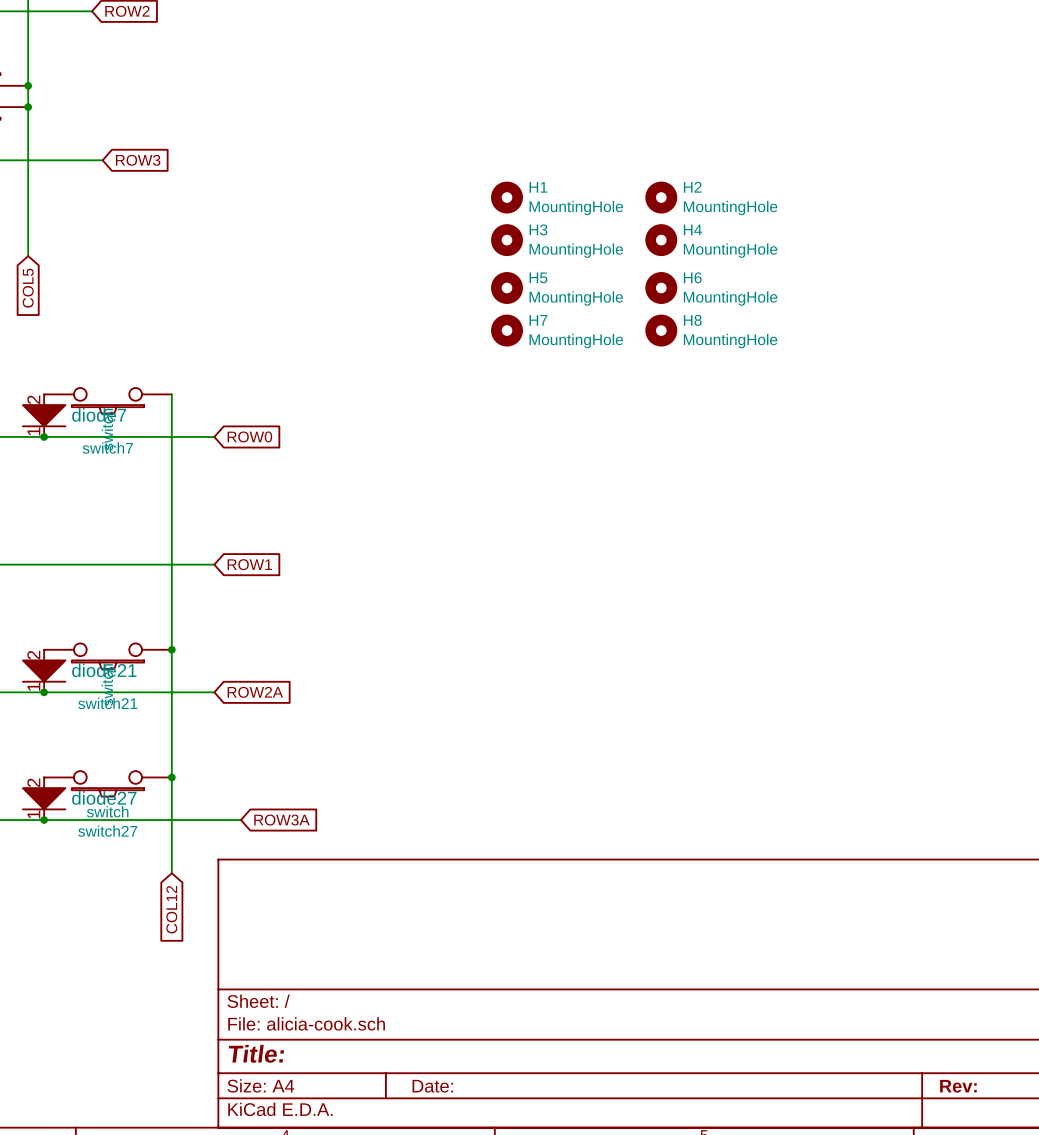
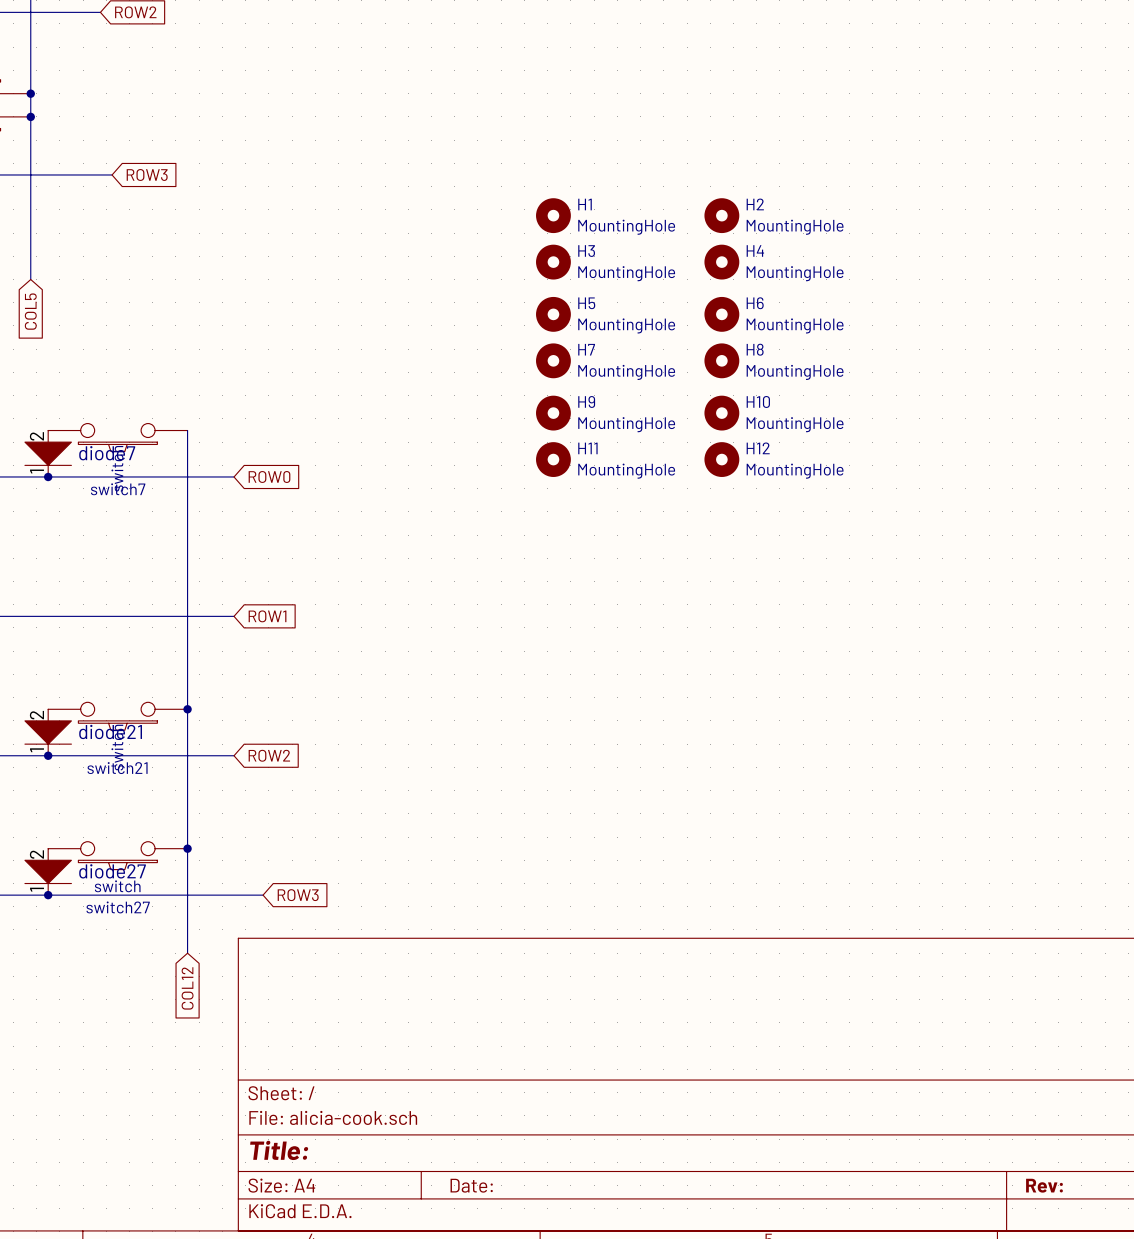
H9: none -> MountingHole (553, 413)
H10: none -> MountingHole (721, 413)
H11: none -> MountingHole (553, 459)
H12: none -> MountingHole (721, 459)
global label: ROW2A (255, 692) -> ROW2 (269, 755)
global label: ROW3A (281, 820) -> ROW3 (298, 895)

